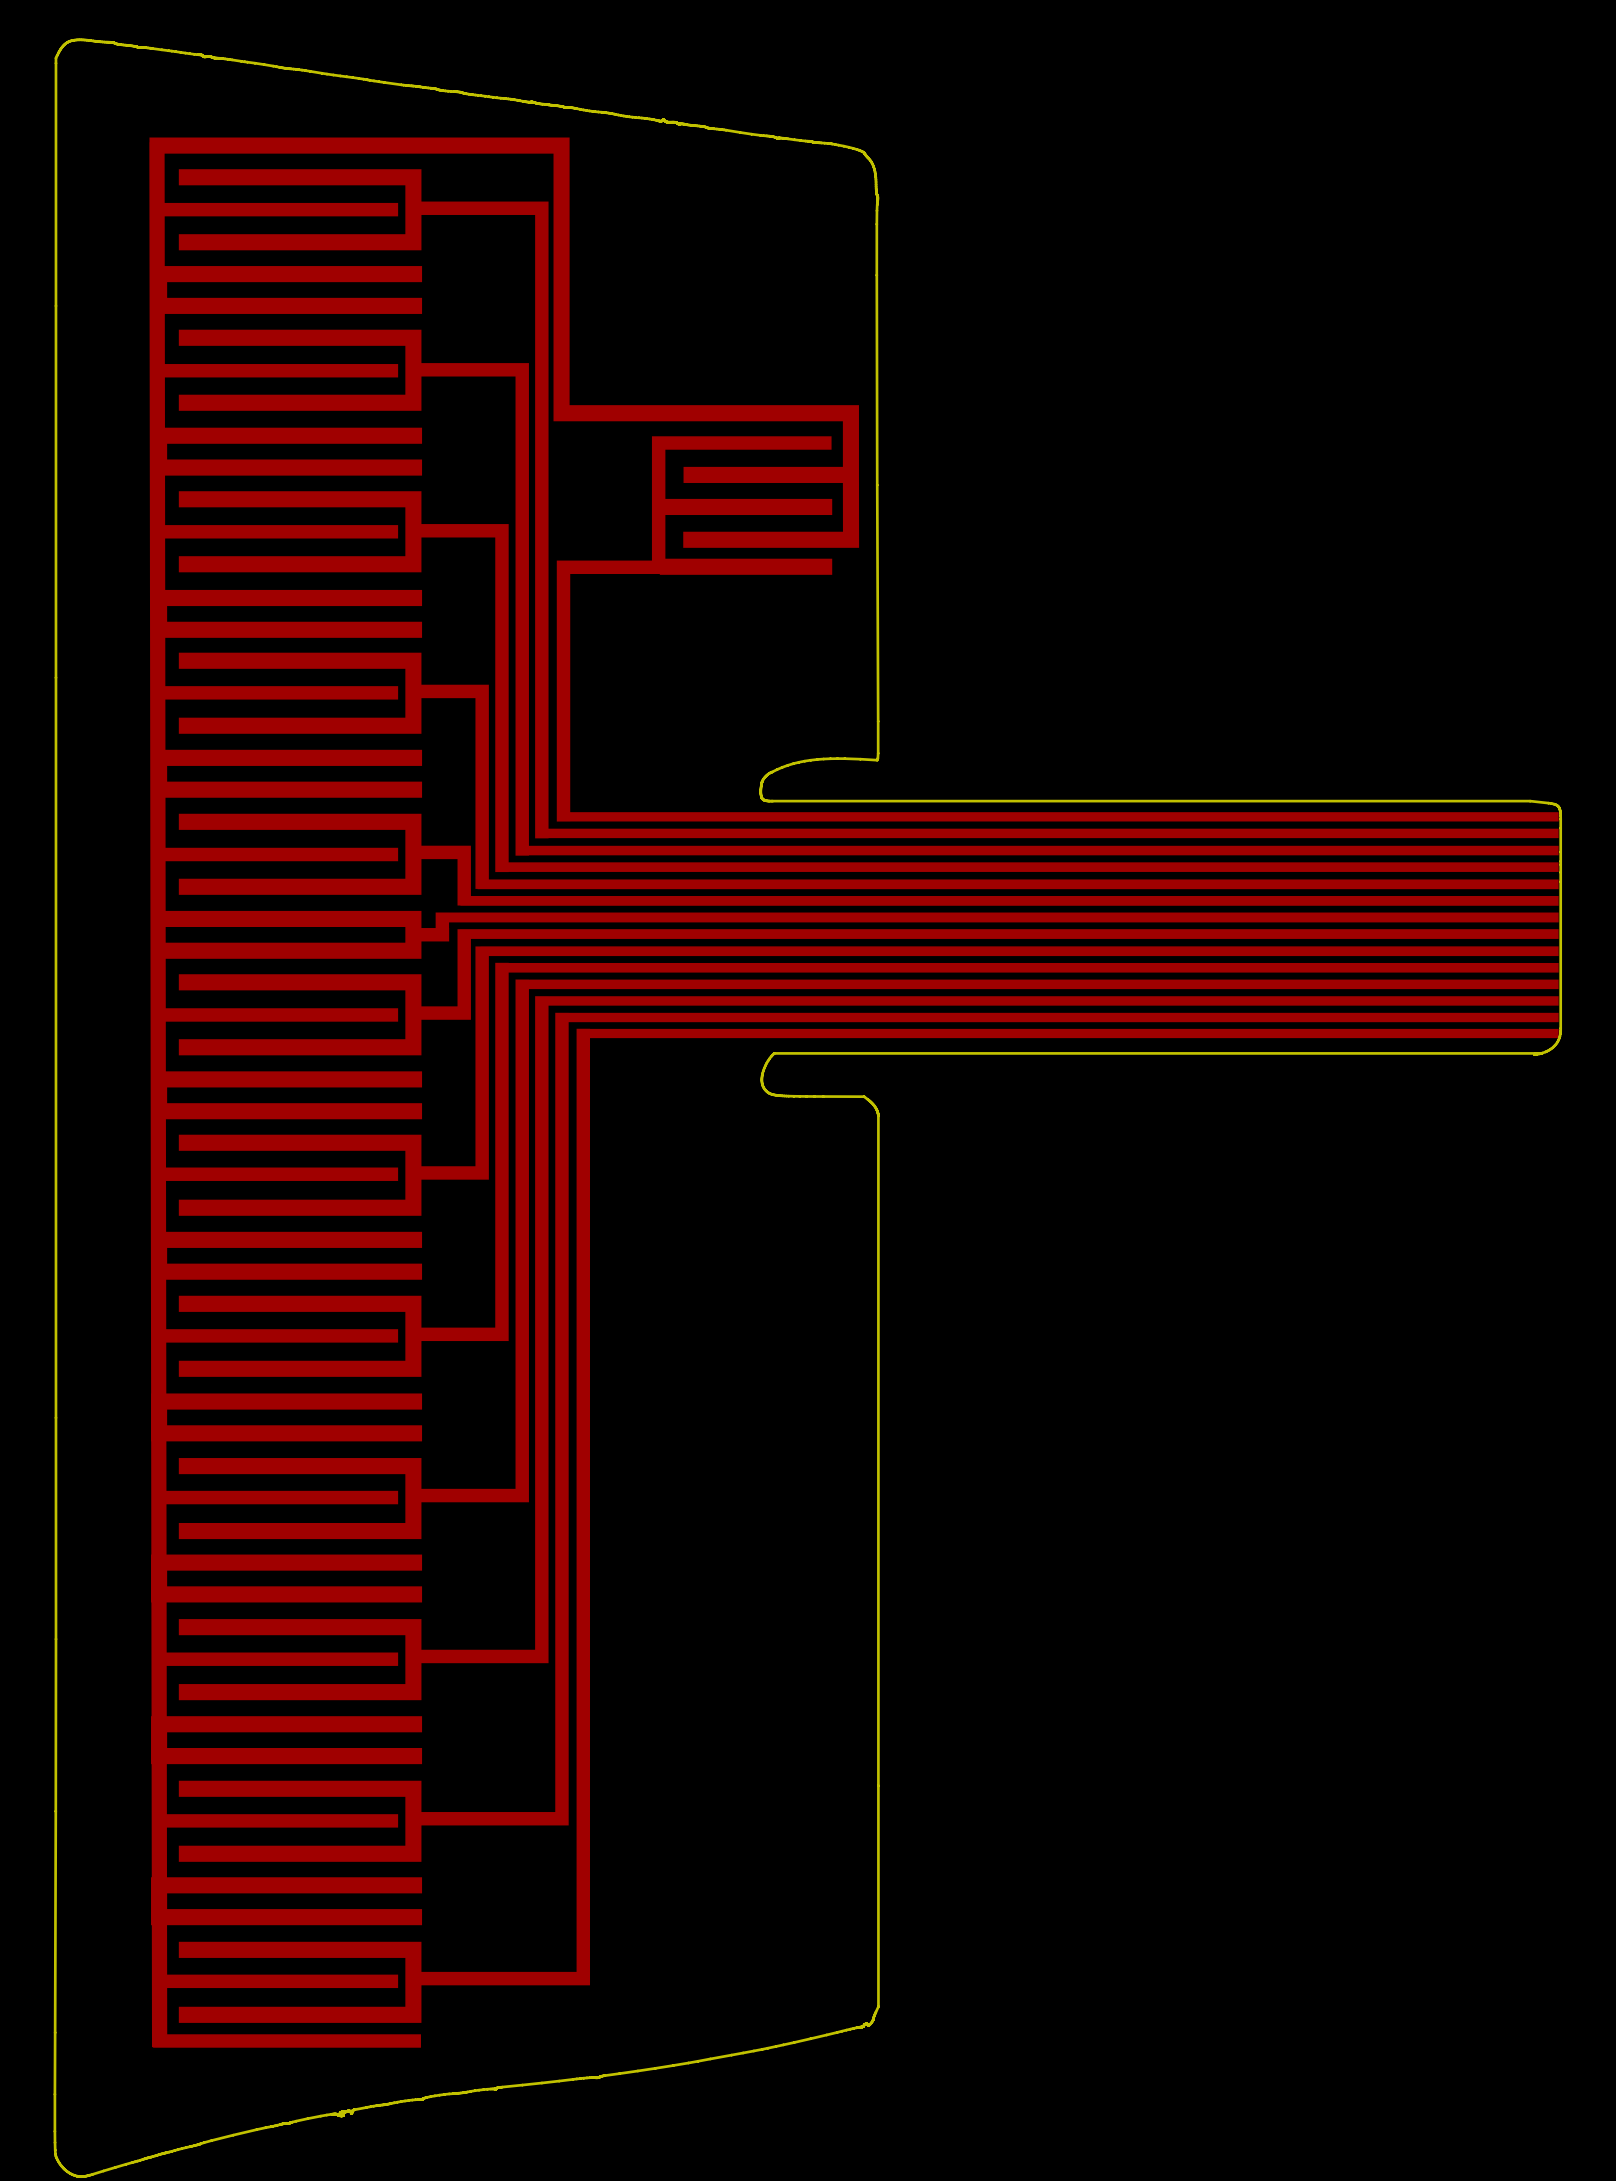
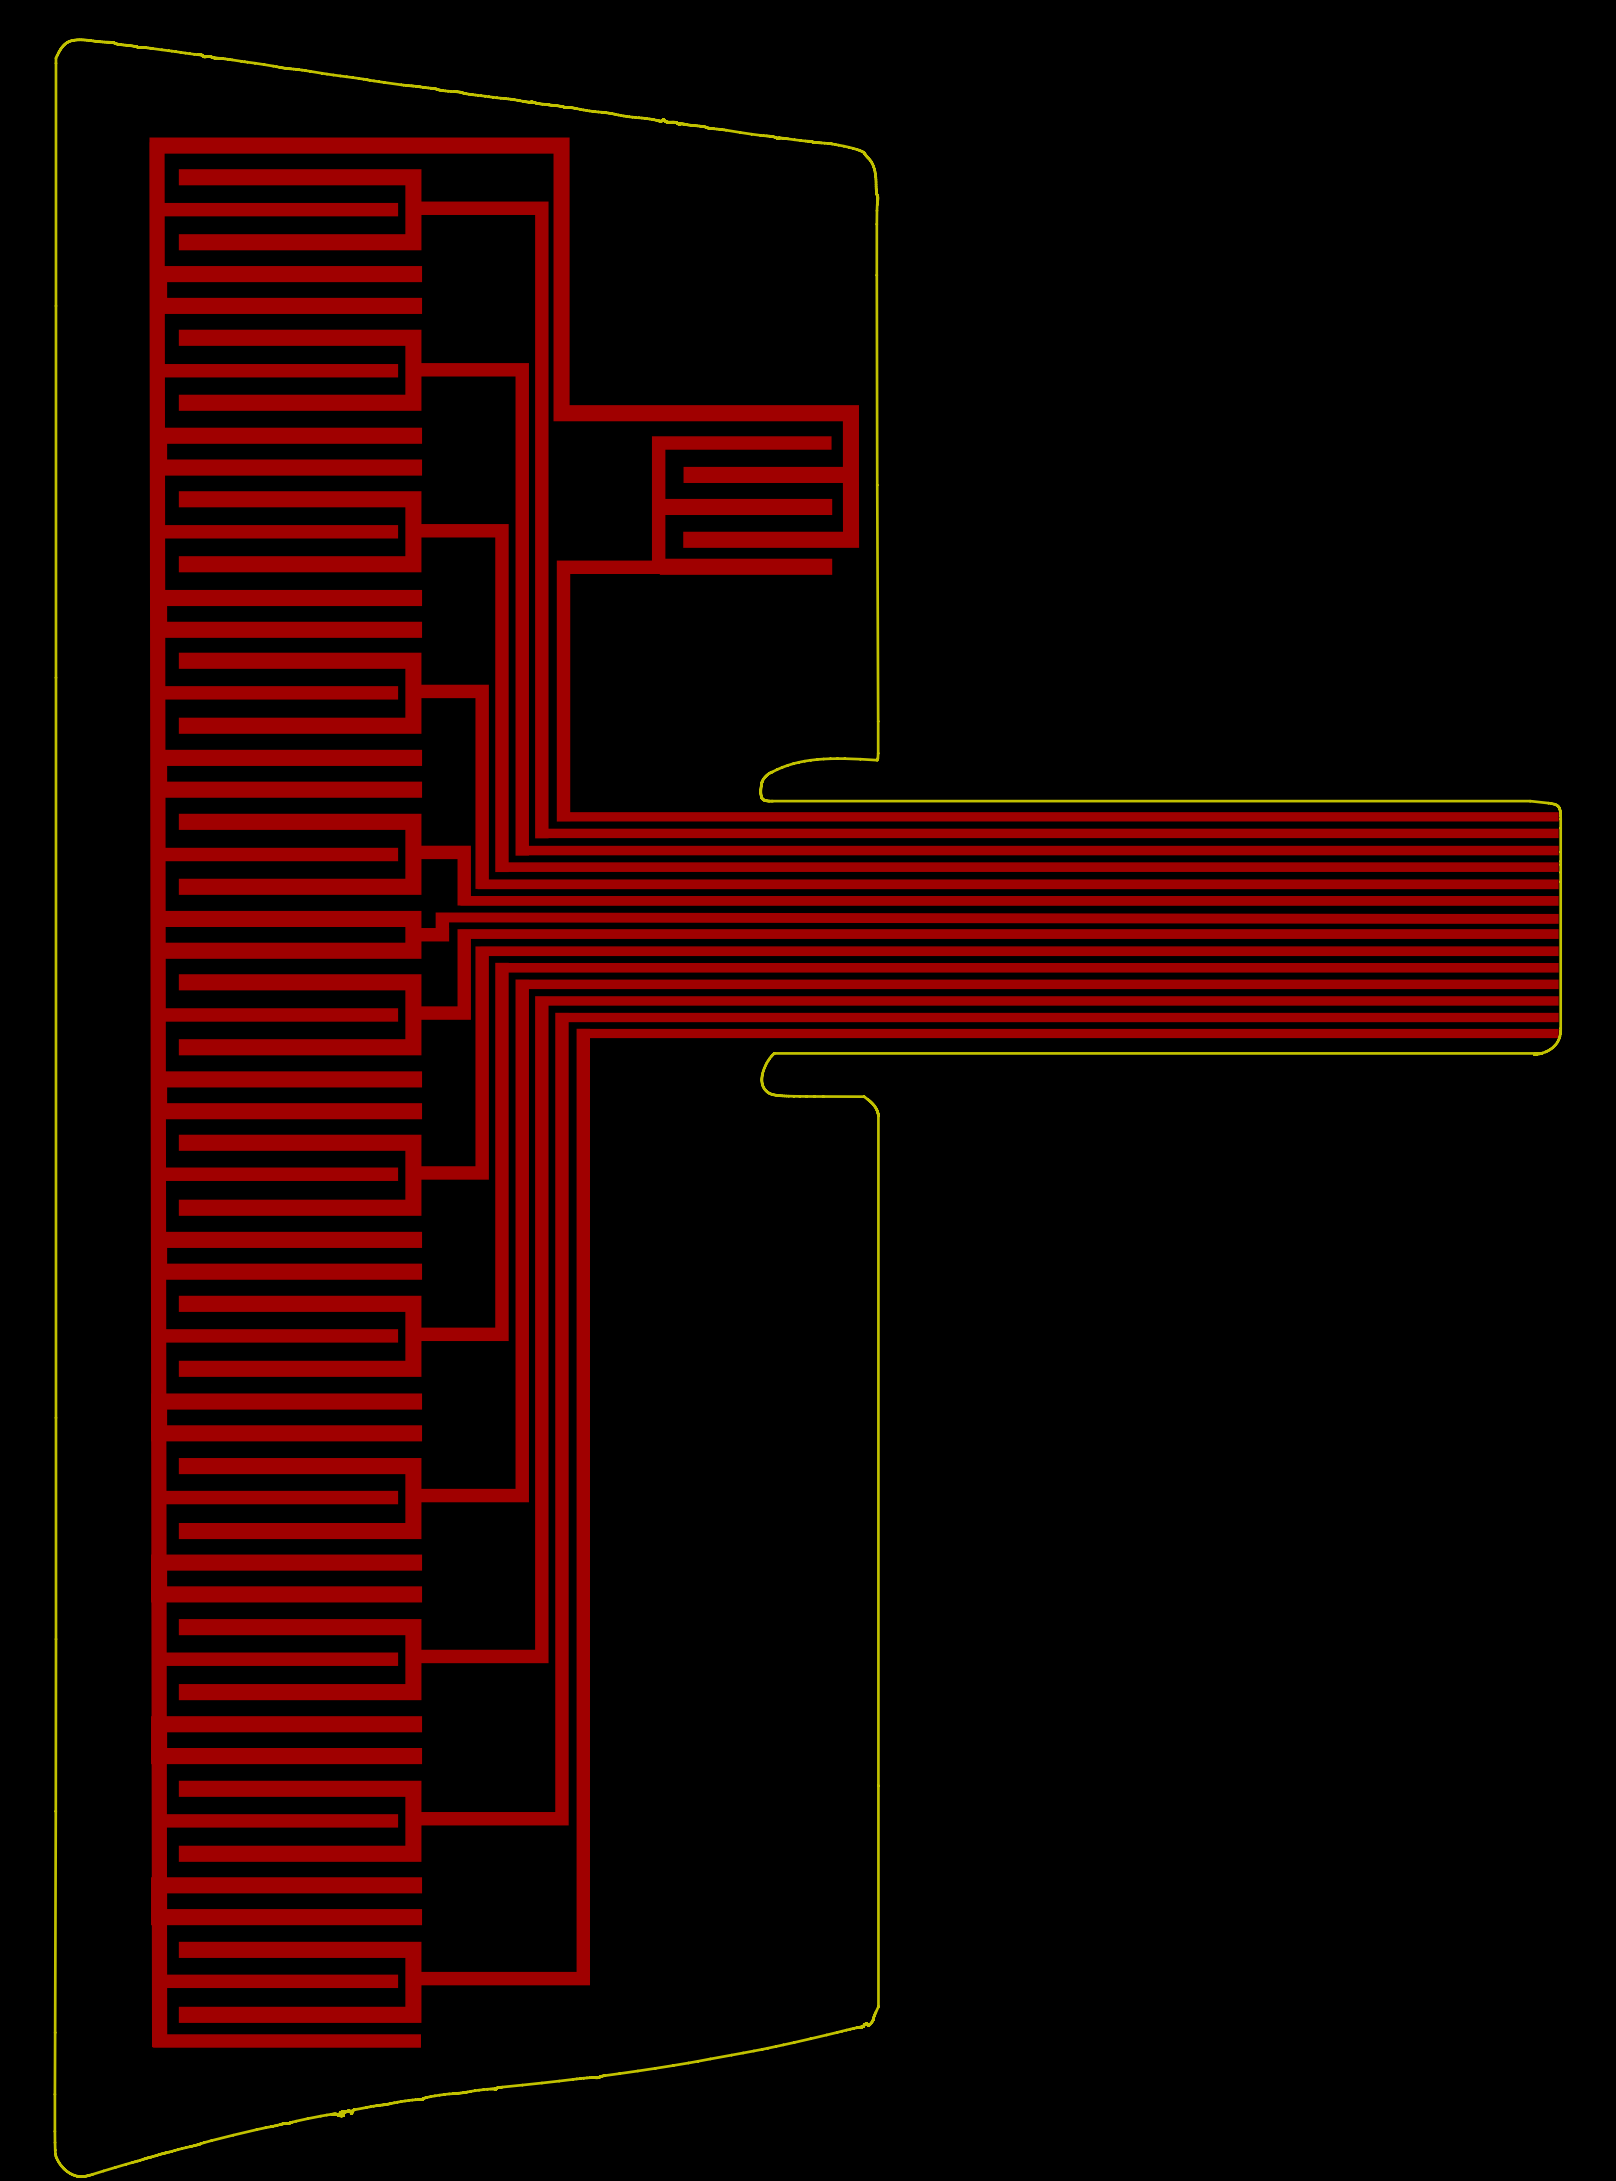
drawing shape: [149, 137, 1559, 2048] -> [149, 137, 1559, 2048]

